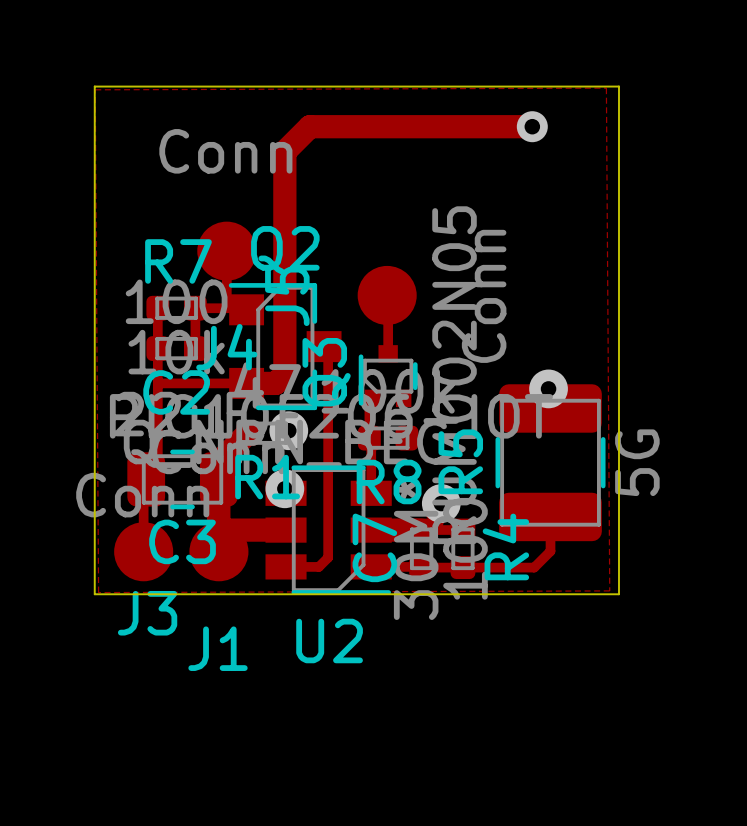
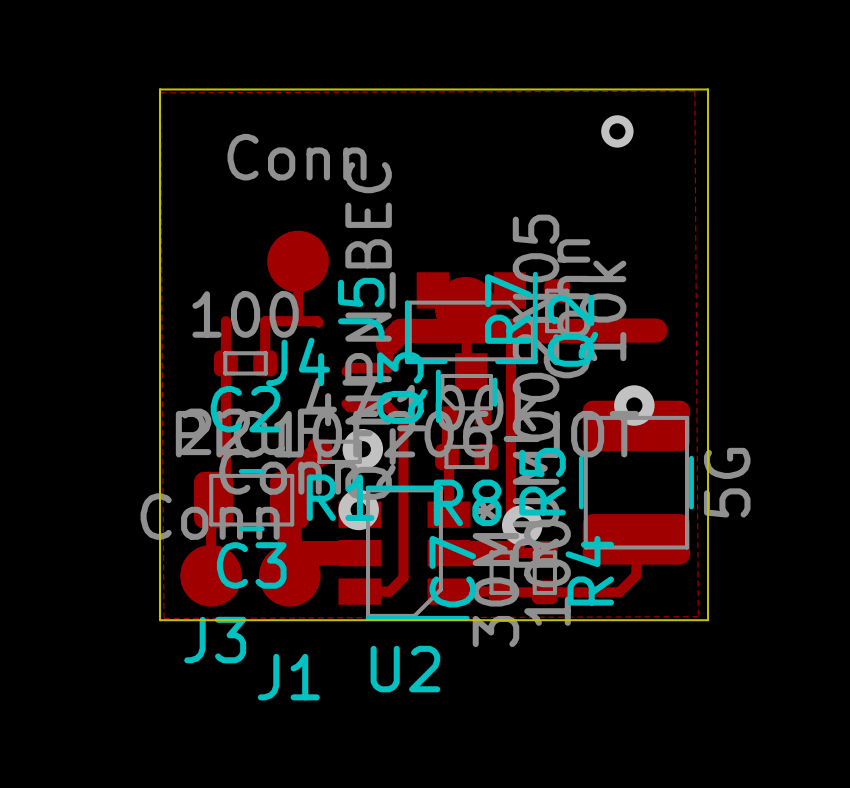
track: (532, 126) (309, 126) (284, 151) (284, 374) (275, 383) (157, 384) -> none
R7 rotation: 0° (176, 308) -> 90° clockwise (557, 310)
R7 position: (176, 308) -> (557, 310)
track: none -> (509, 330) (510, 536)
track: none -> (591, 330) (400, 330) (388, 343) (388, 367) (349, 367) (346, 371)
track: none -> (599, 330) (655, 330)
Q2 rotation: 0° (285, 346) -> 90° clockwise (471, 330)
Q2 position: (285, 346) -> (471, 330)
track: (324, 346) (328, 350) (328, 557) (318, 566) (314, 566) -> (346, 403) (349, 407) (388, 407) (403, 422) (403, 577) (389, 591)

